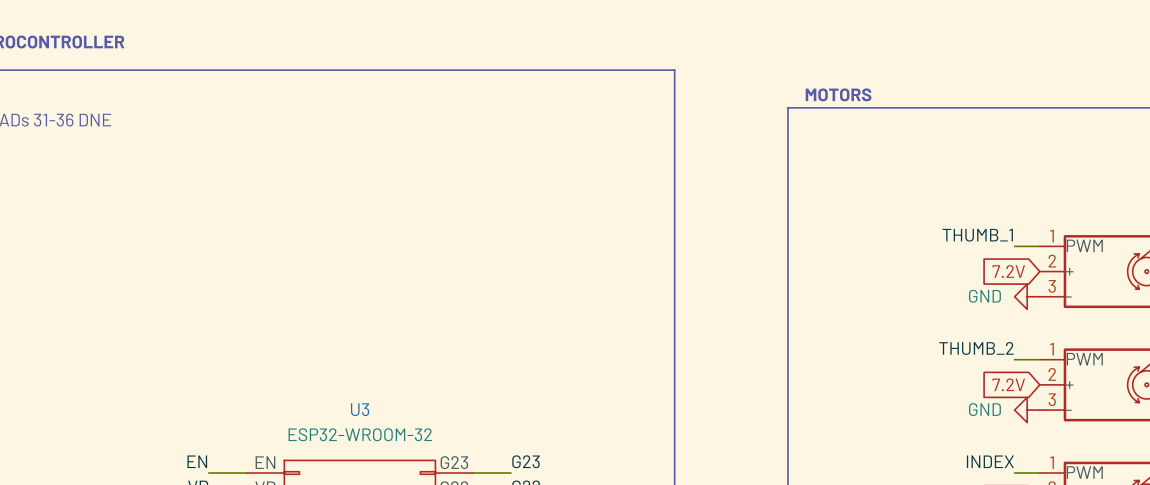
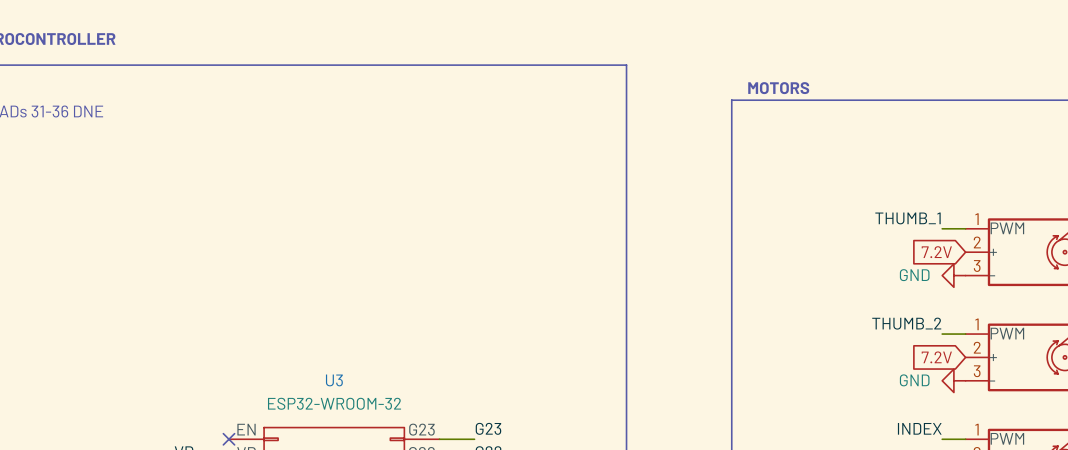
label: EN (197, 461) -> none
wire: (208, 473) (246, 473) -> none
no-connect mark: none -> (228, 439)

